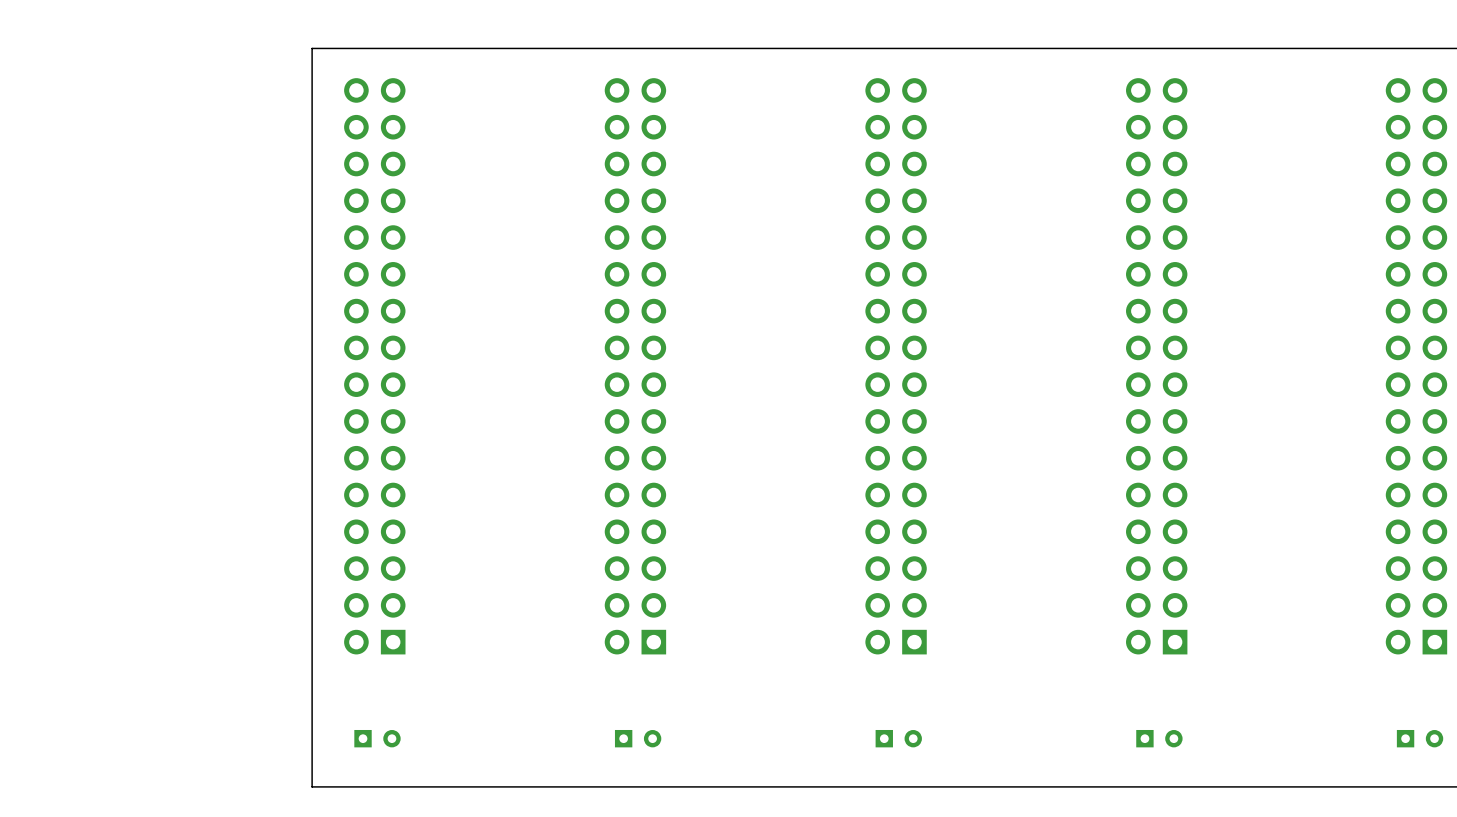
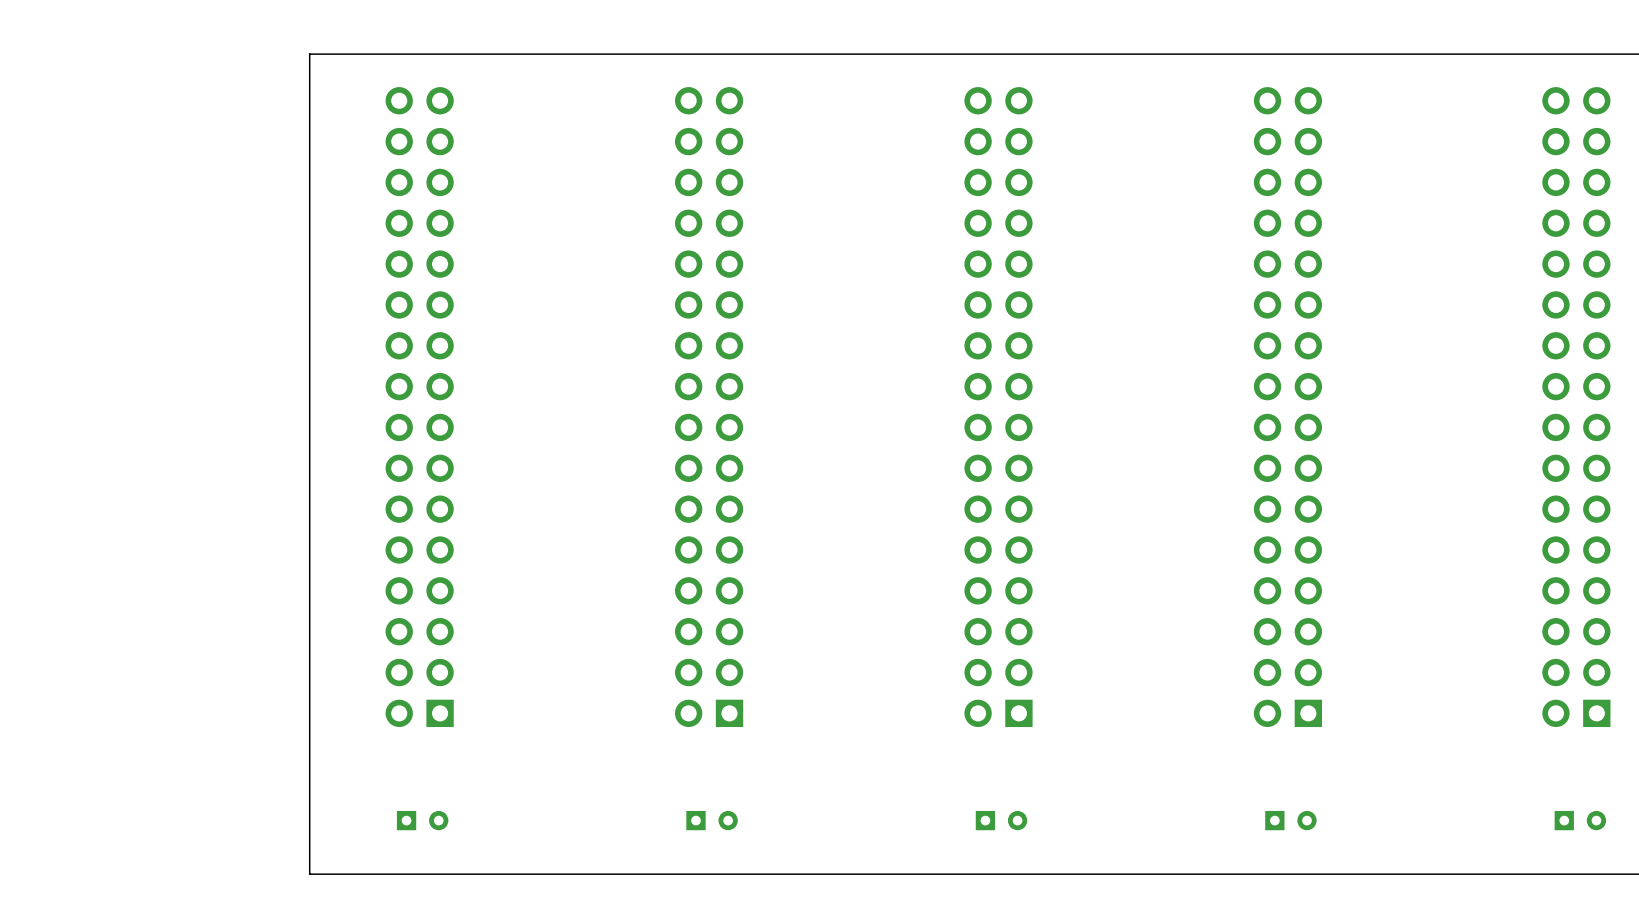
board edge: (312, 48) (312, 786) -> (350, 54) (309, 54) (309, 874) (350, 874)

